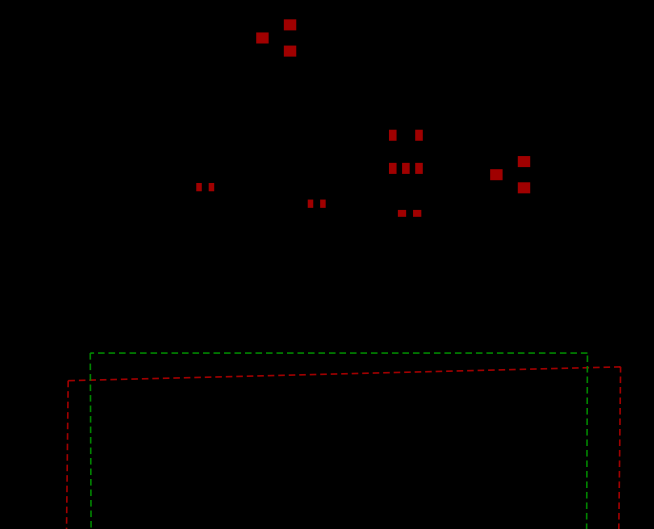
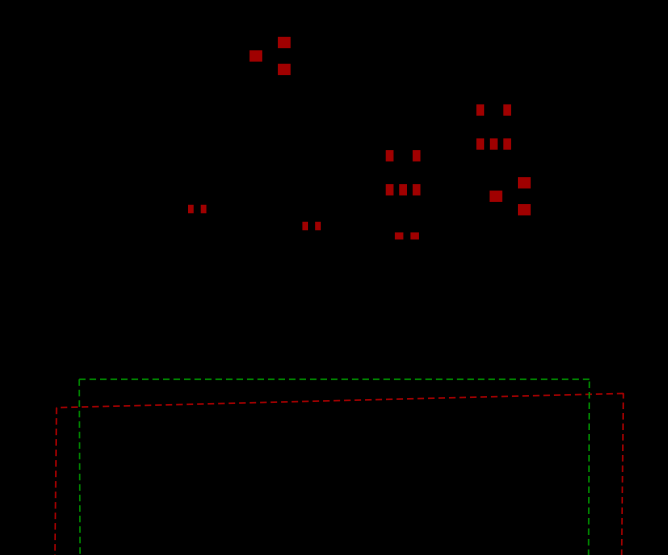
part: none -> (493, 127)

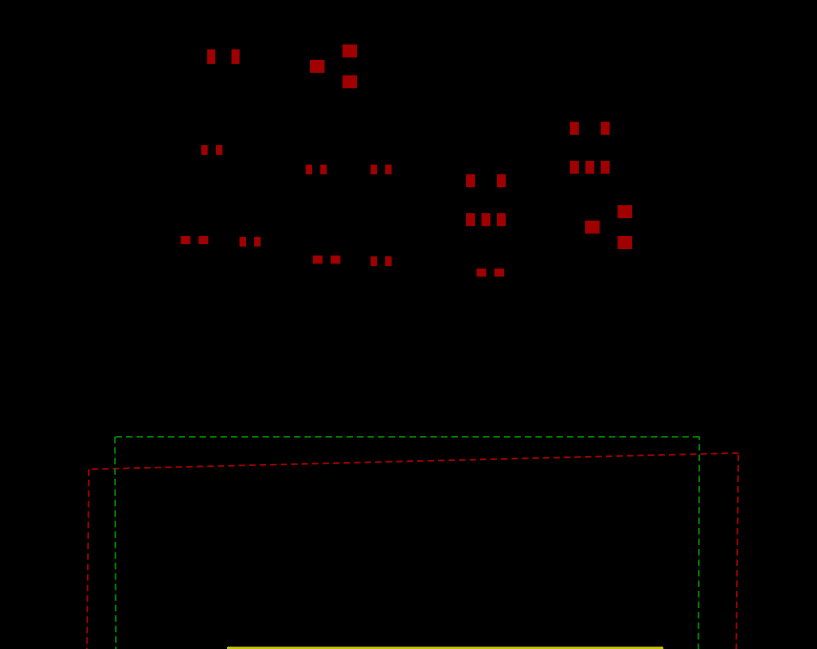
part: none -> (223, 56)
part: none -> (211, 149)
part: none -> (316, 169)
part: none -> (381, 169)
part: none -> (194, 240)
part: none -> (326, 259)

